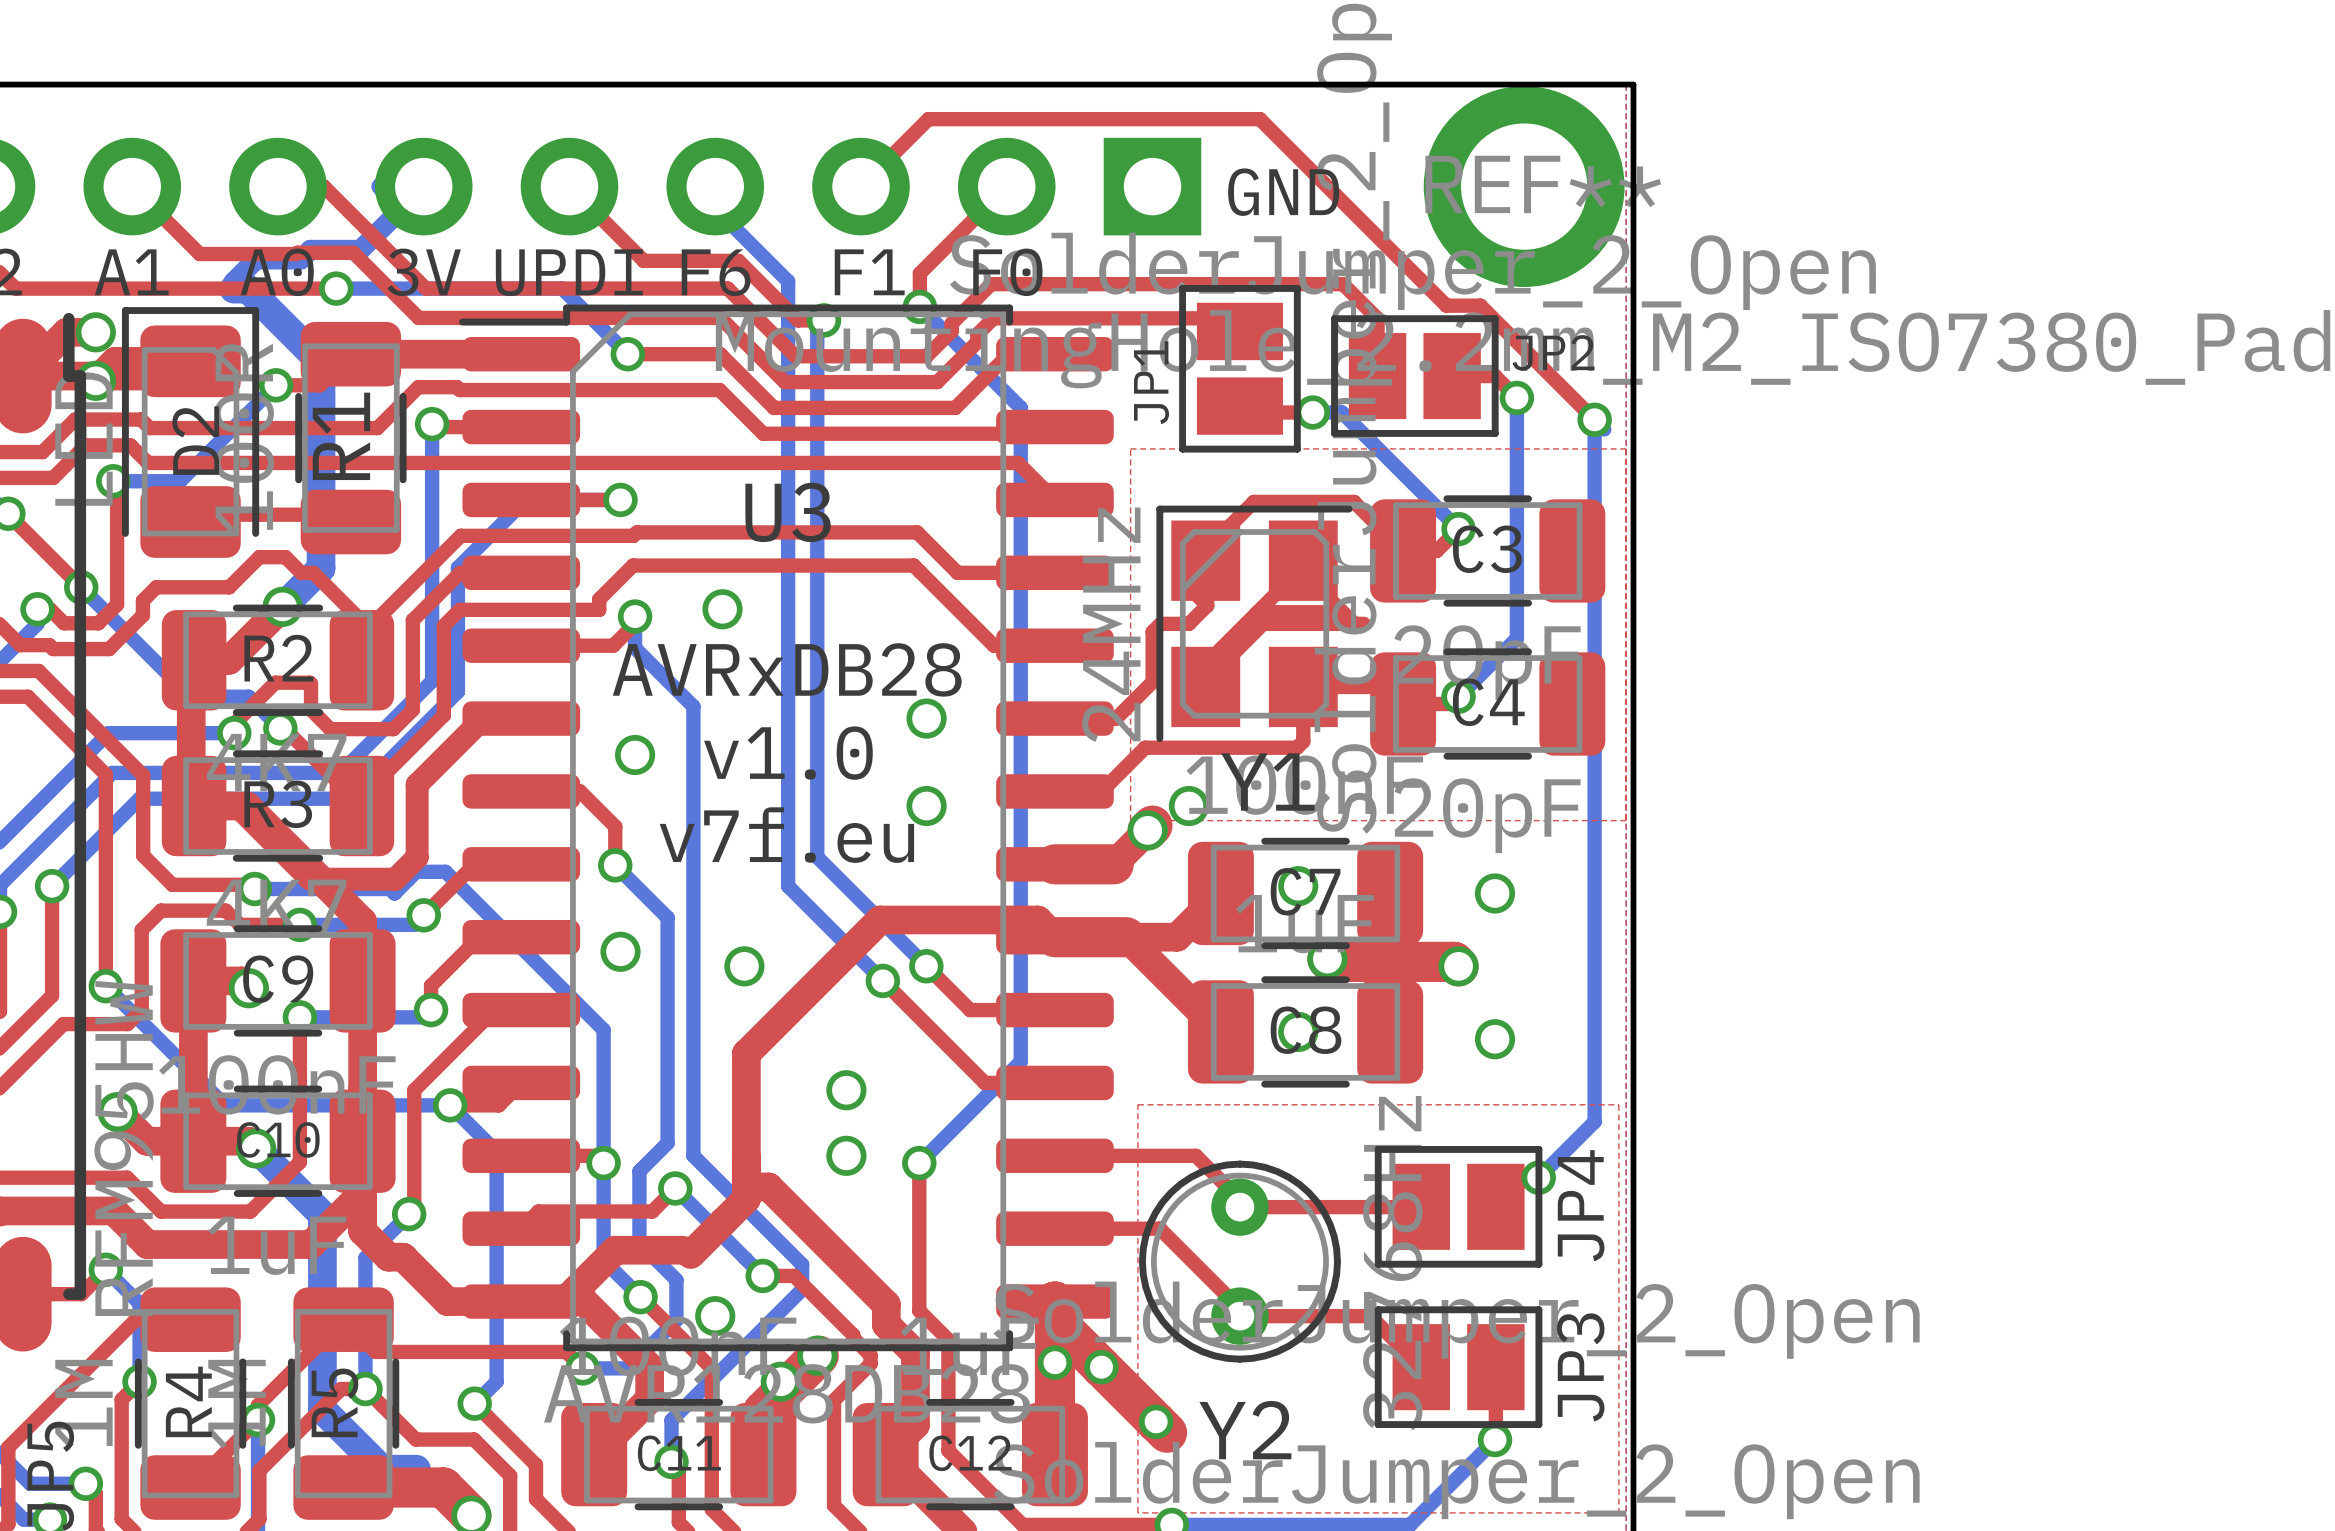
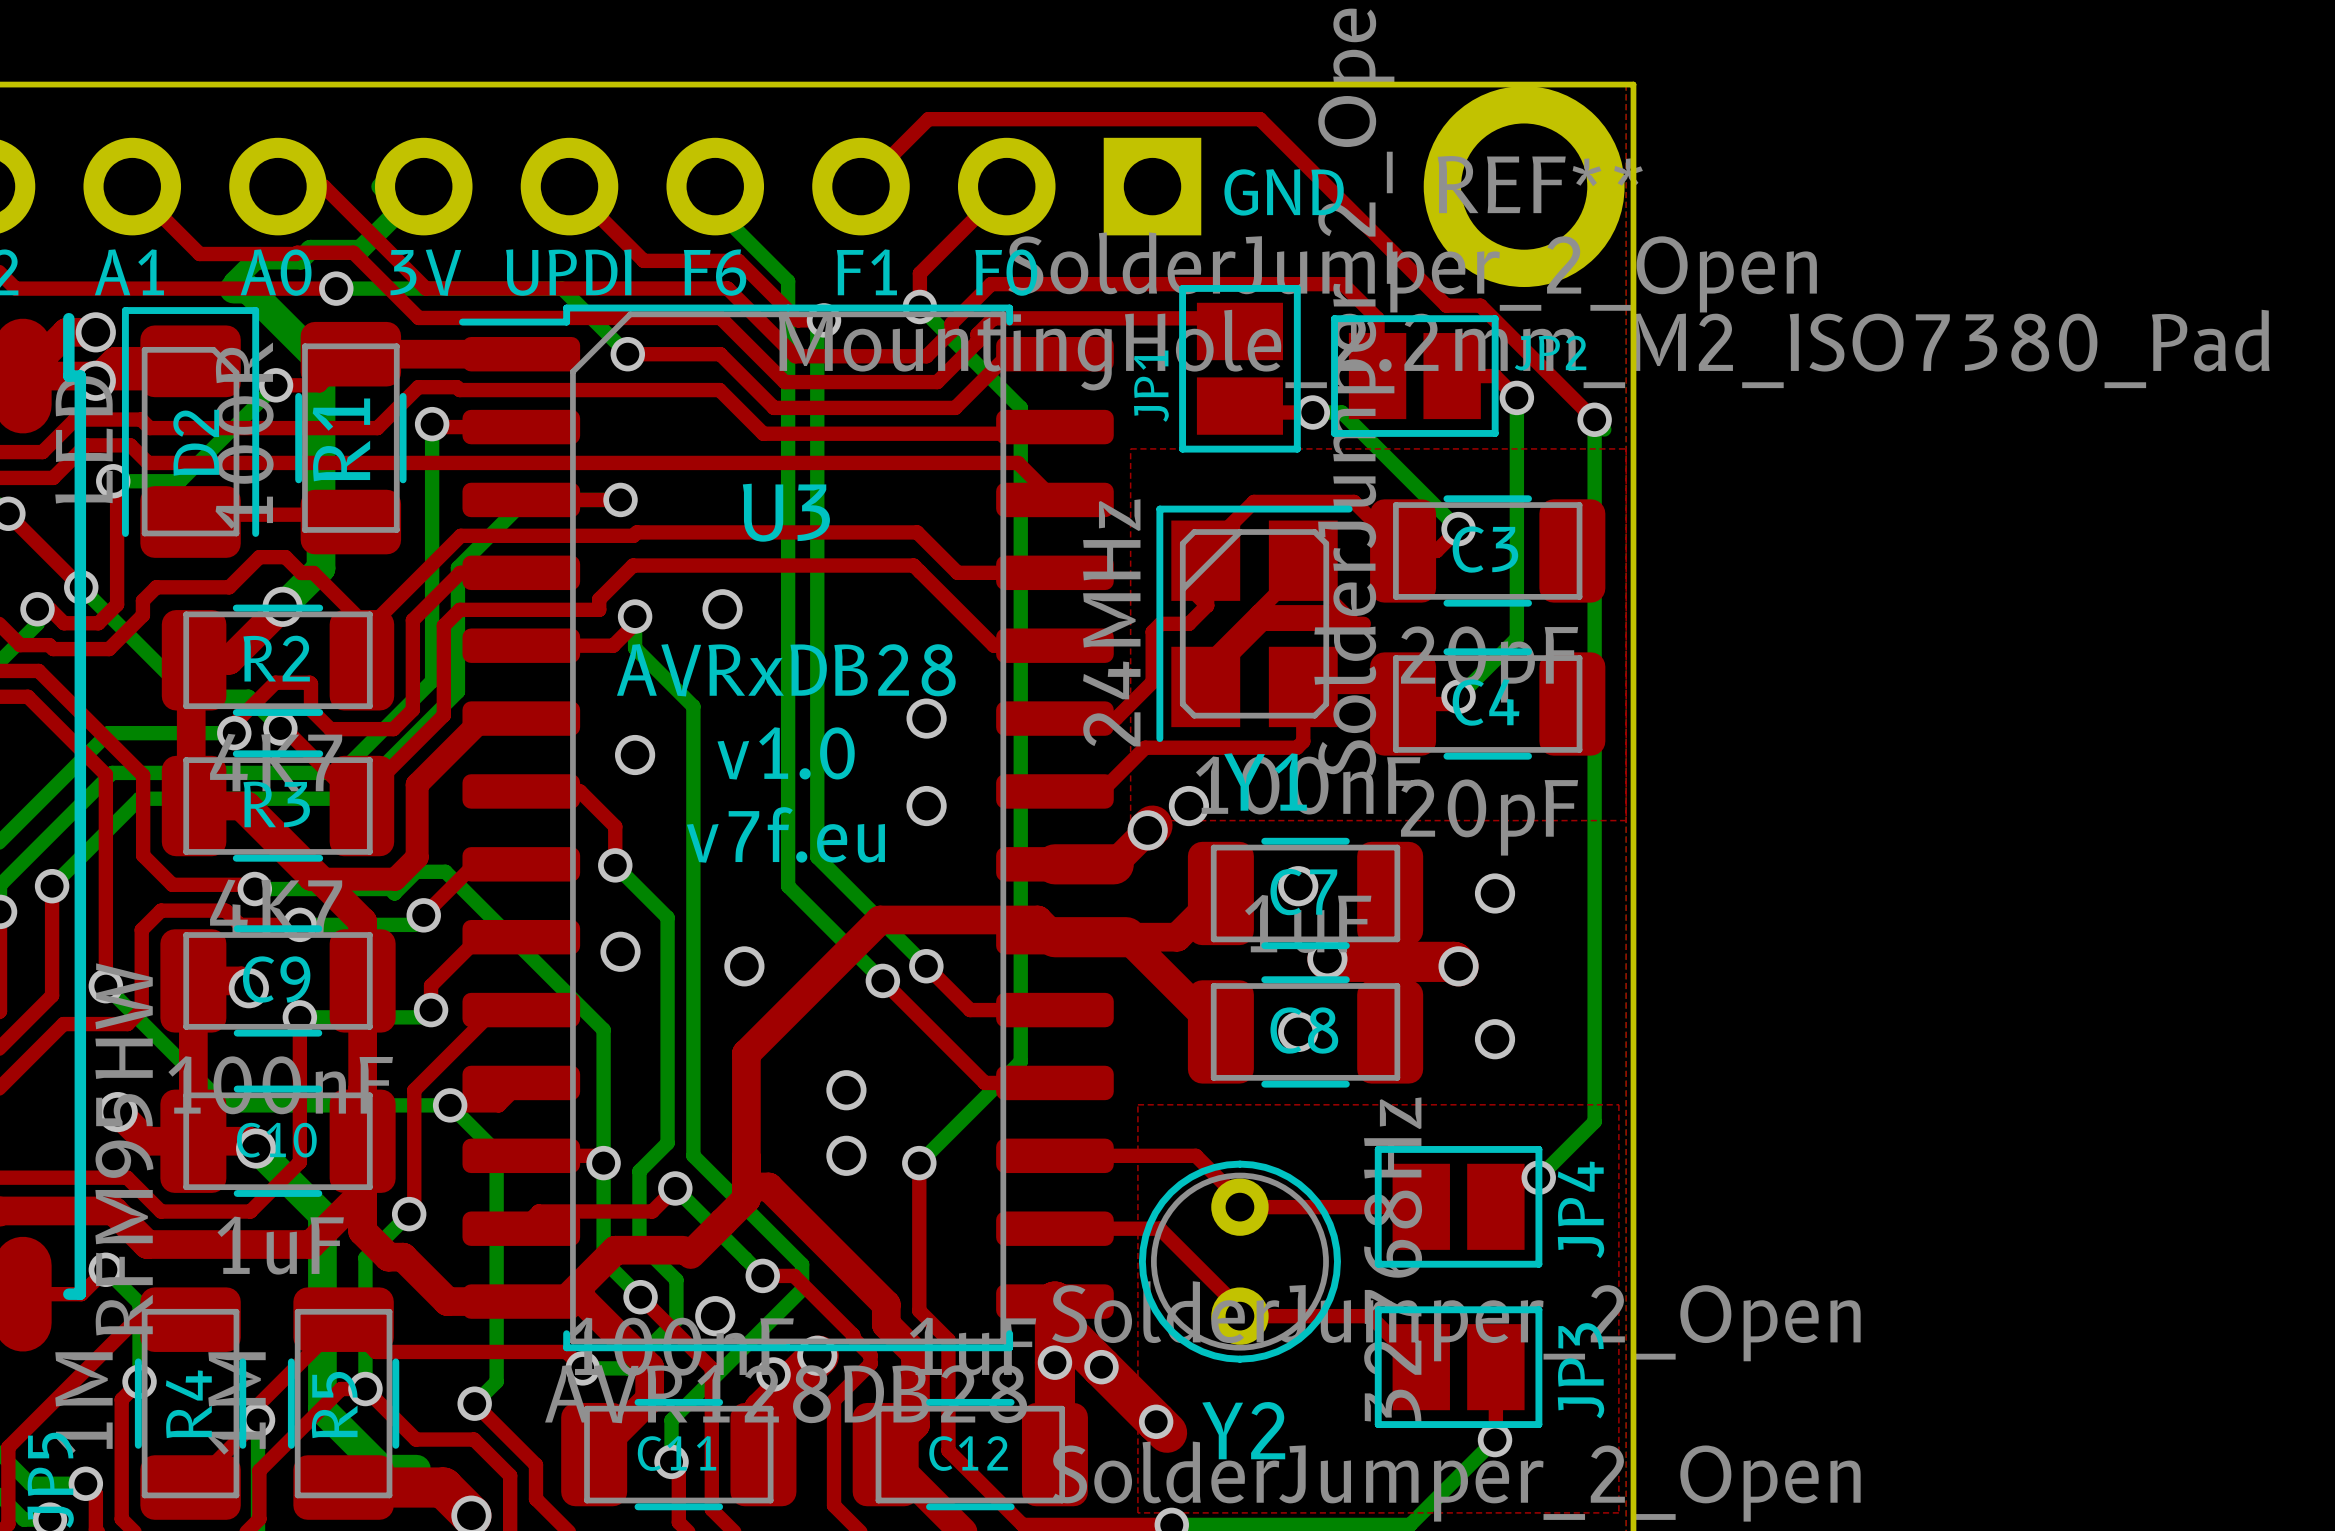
via size: [760, 1361, 801, 1402] -> [756, 1357, 791, 1392]

